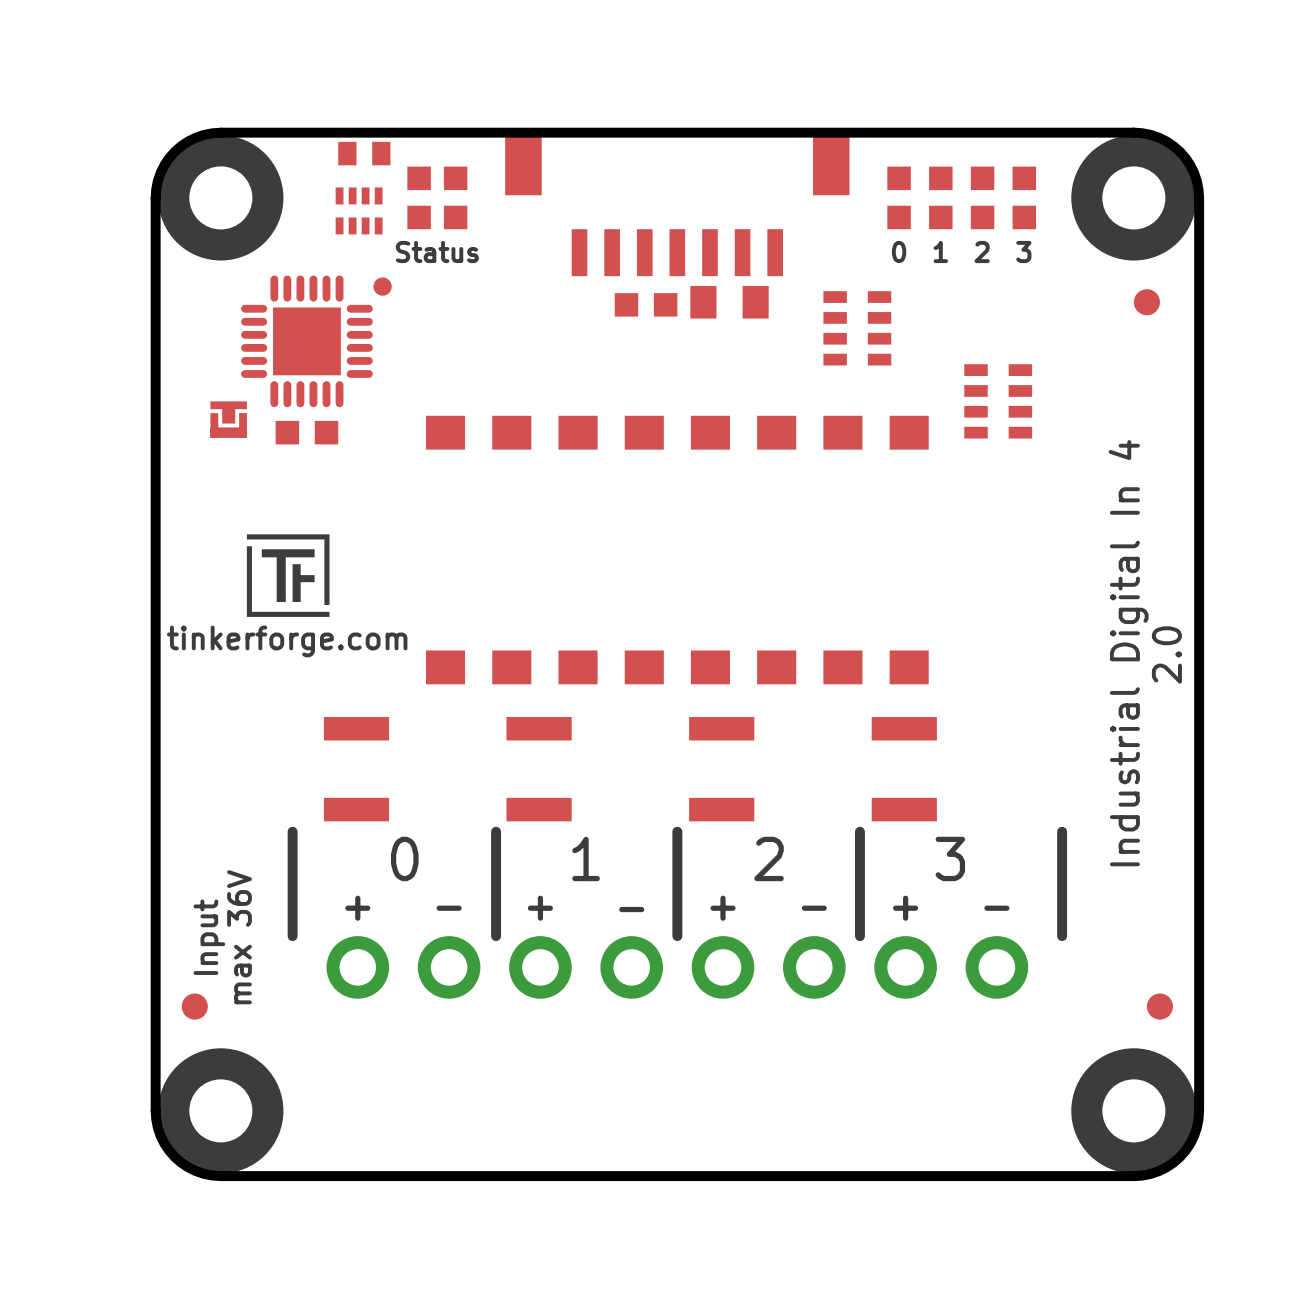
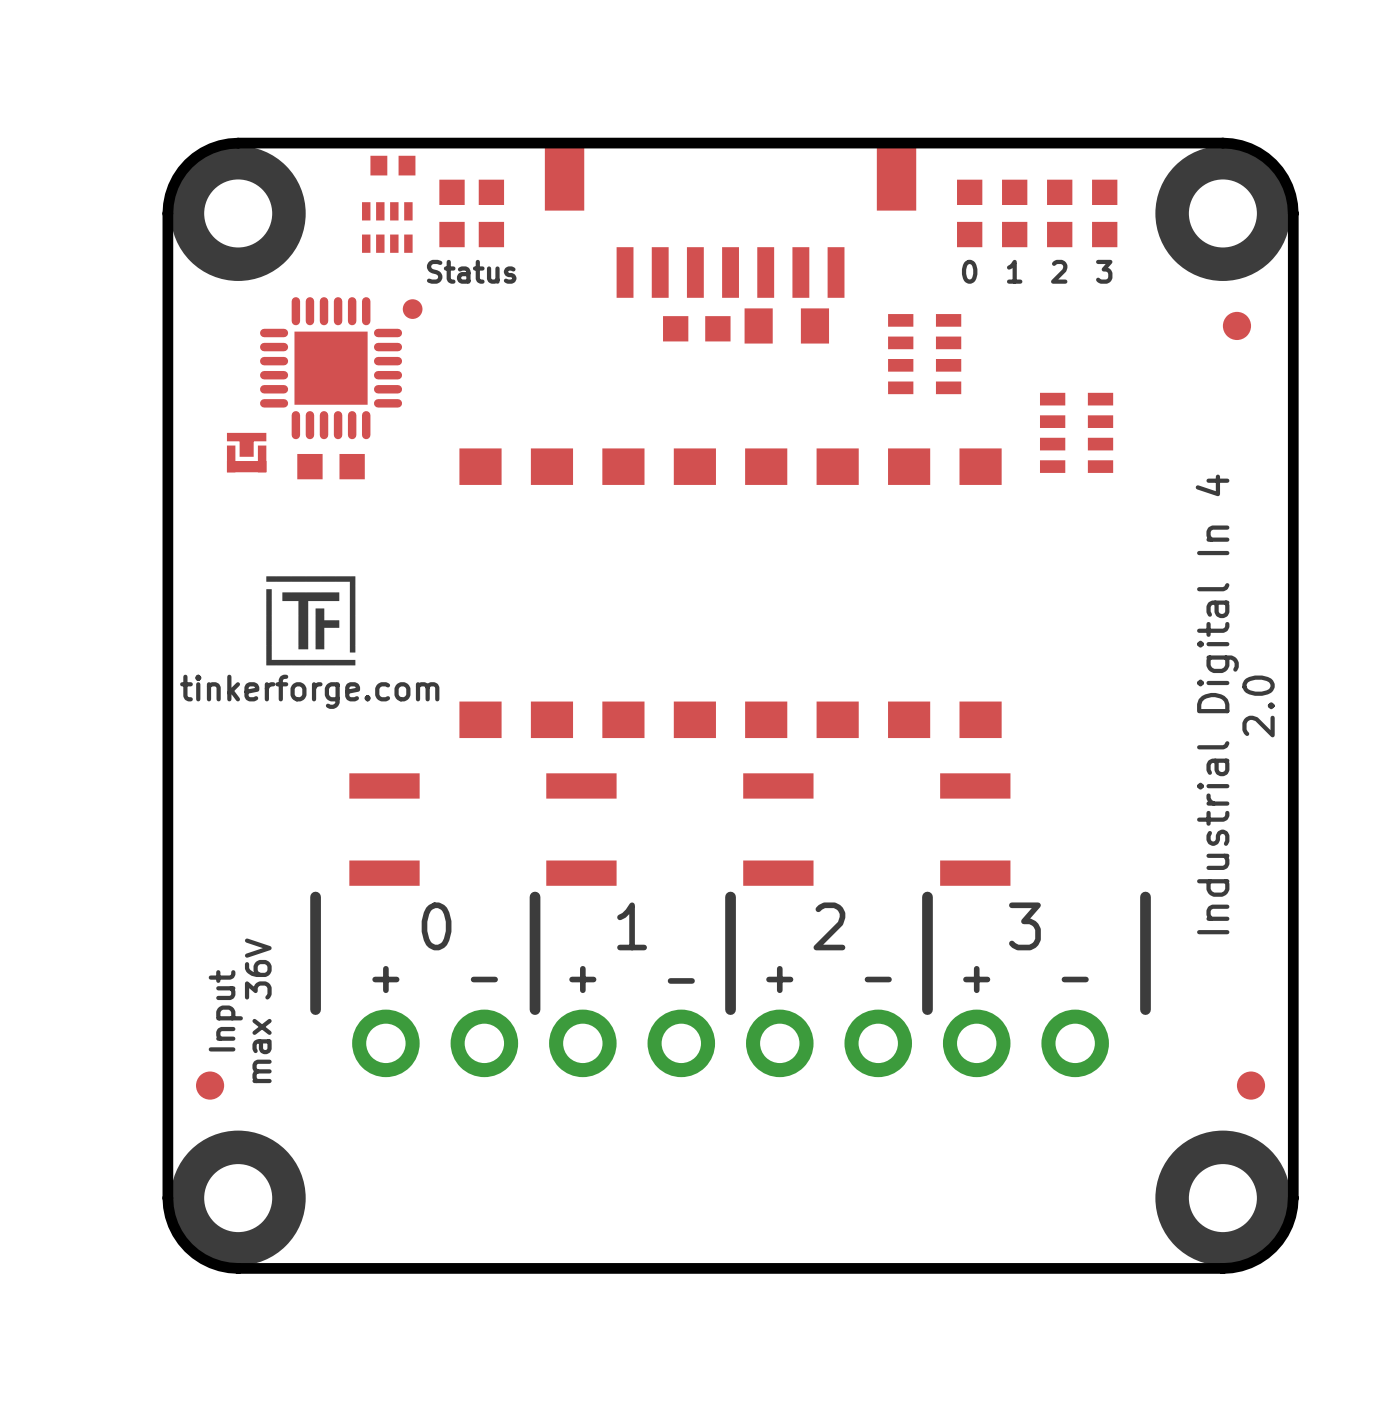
part footprint: [338, 141, 391, 166] -> [370, 155, 416, 176]

